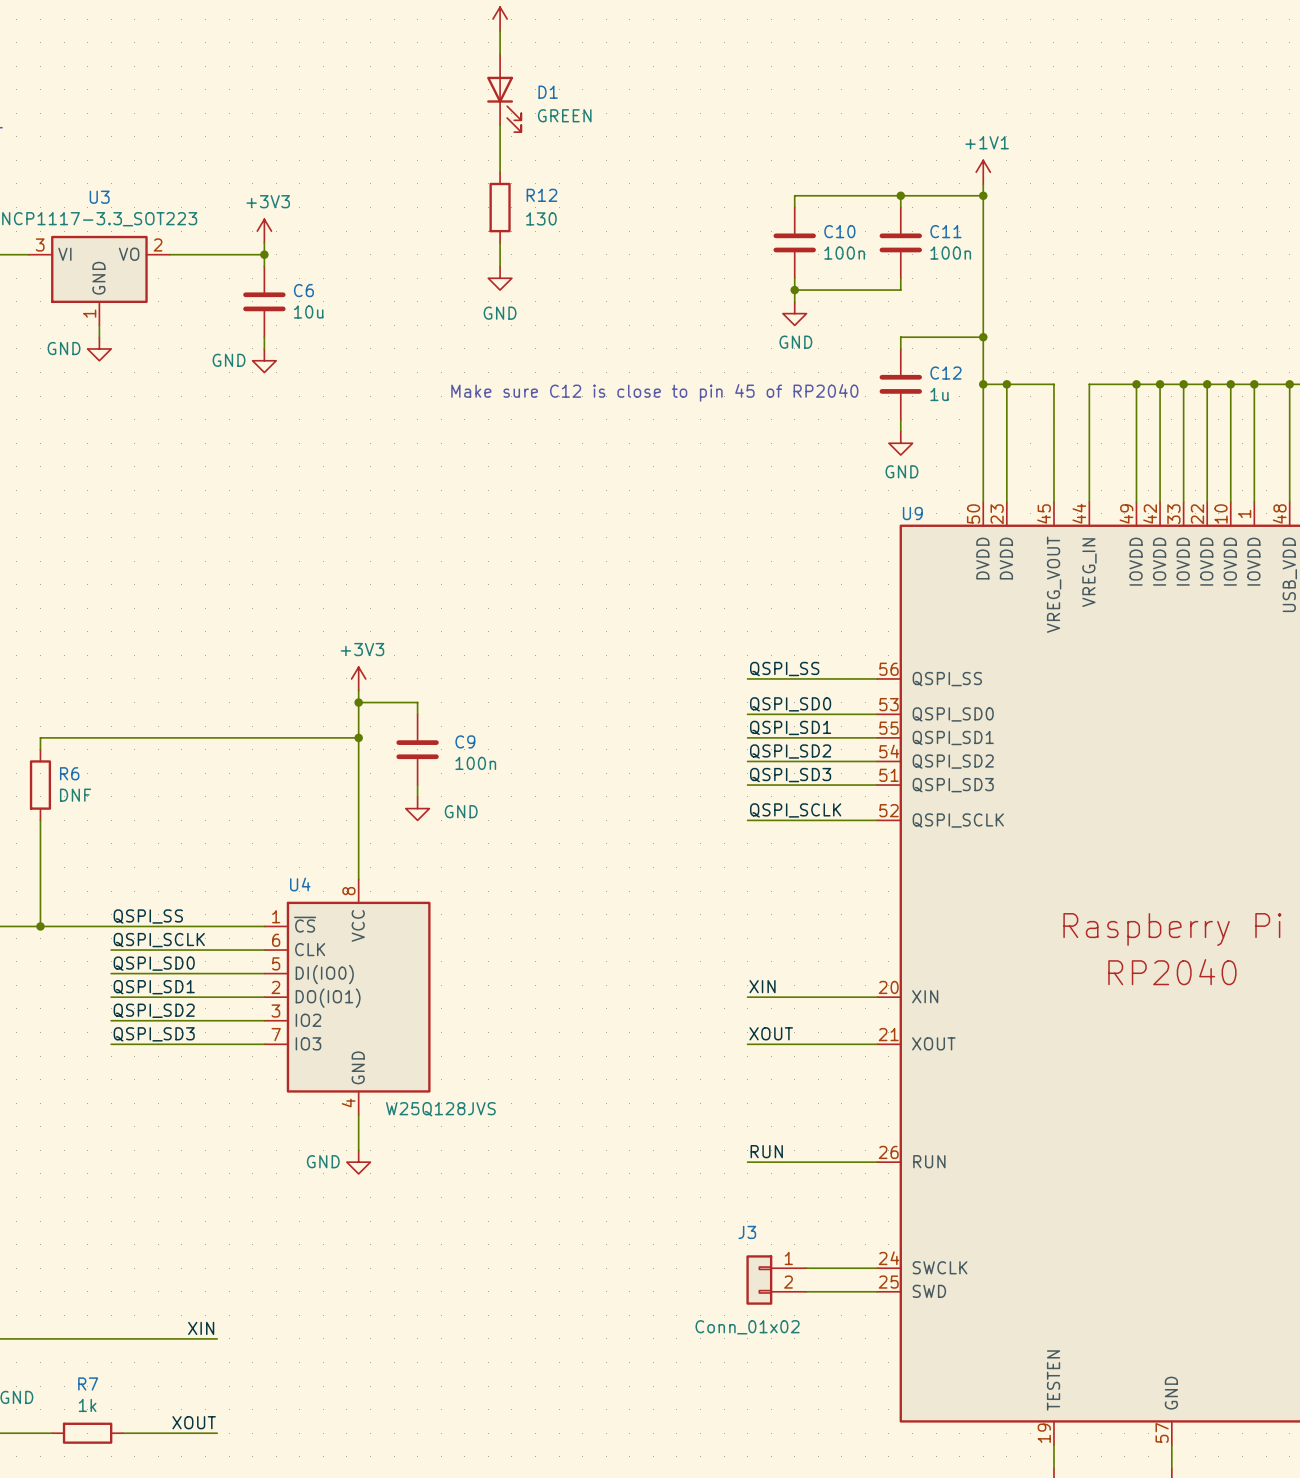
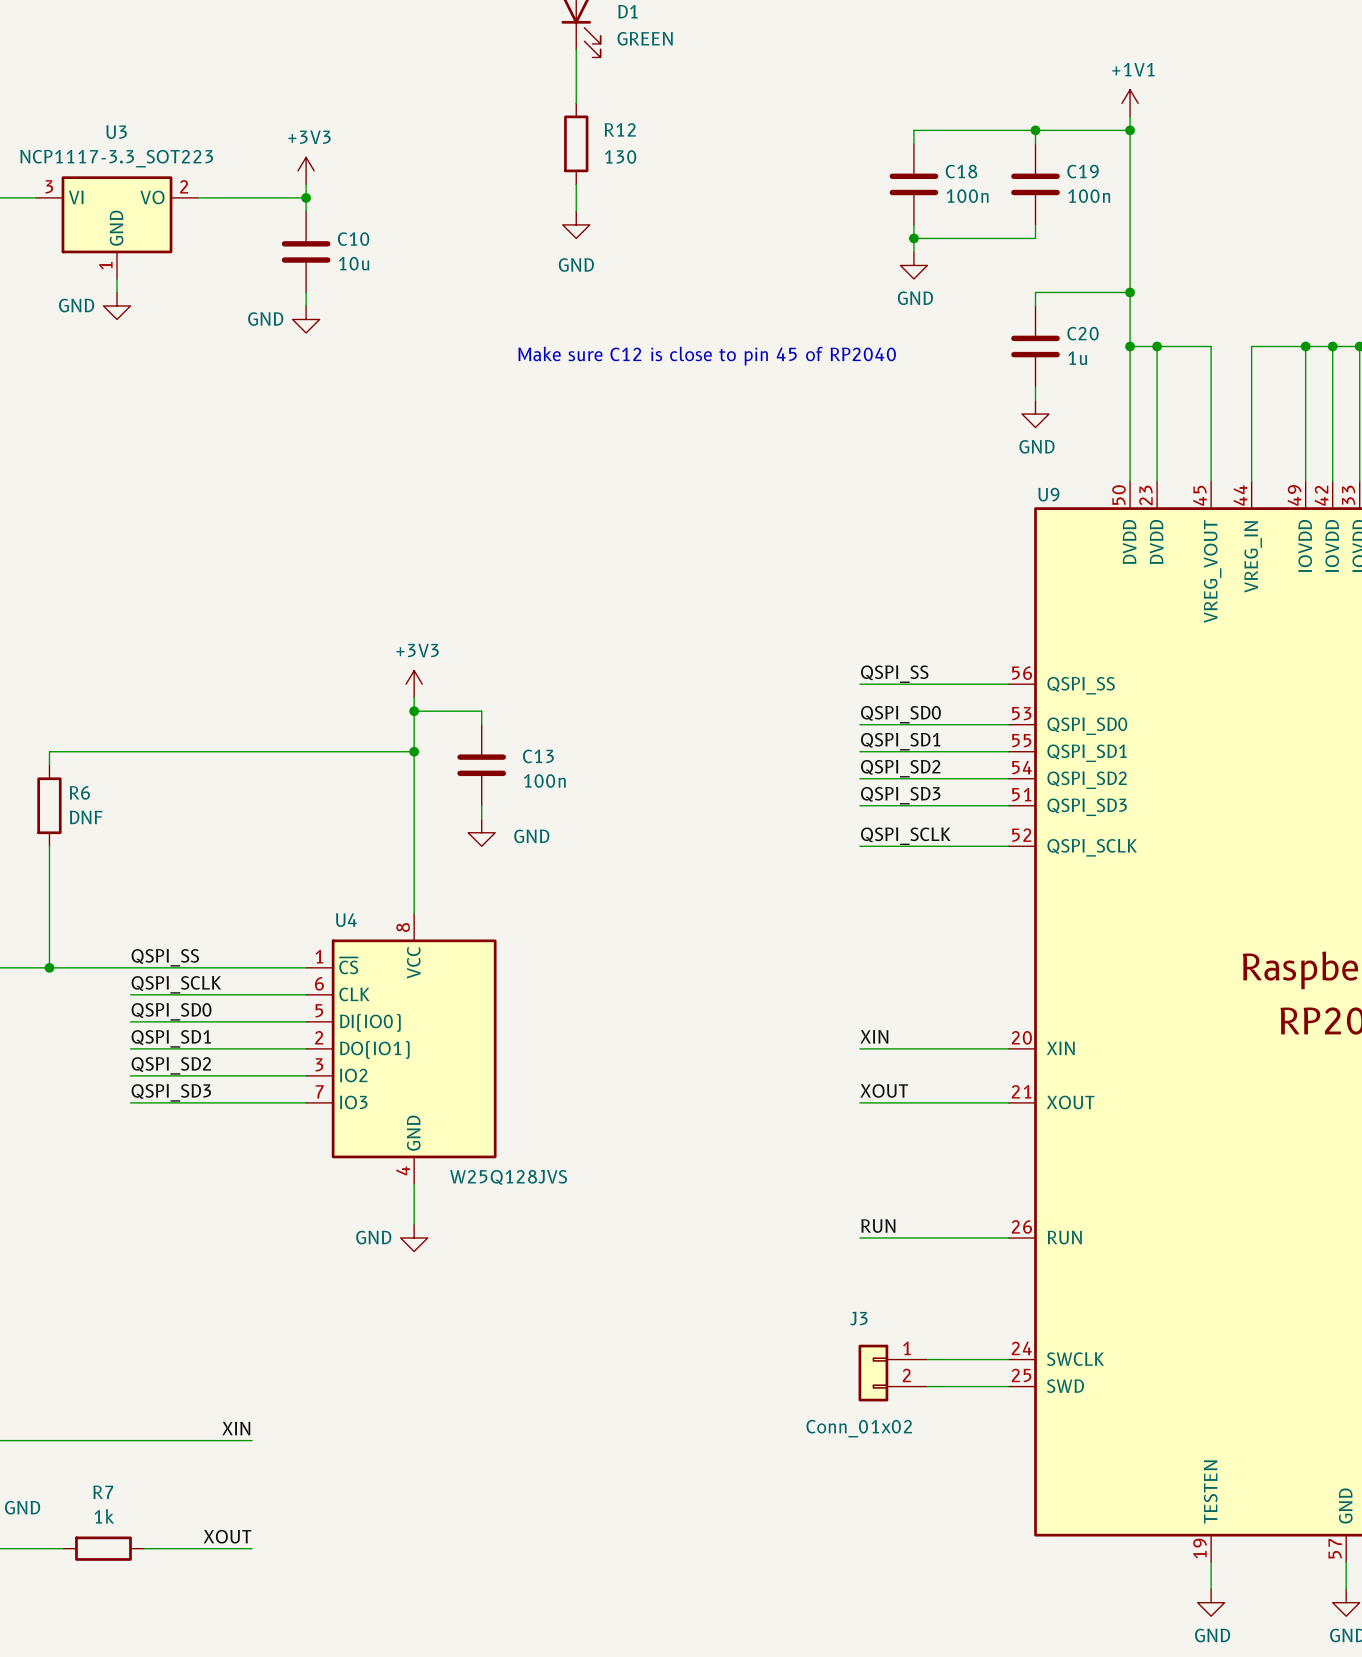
C10 name: C10 (839, 231) -> C18 (961, 171)
C11 name: C11 (945, 231) -> C19 (1083, 171)
C6 name: C6 (303, 290) -> C10 (353, 239)
C12 name: C12 (945, 373) -> C20 (1083, 333)
C9 name: C9 (465, 741) -> C13 (538, 756)

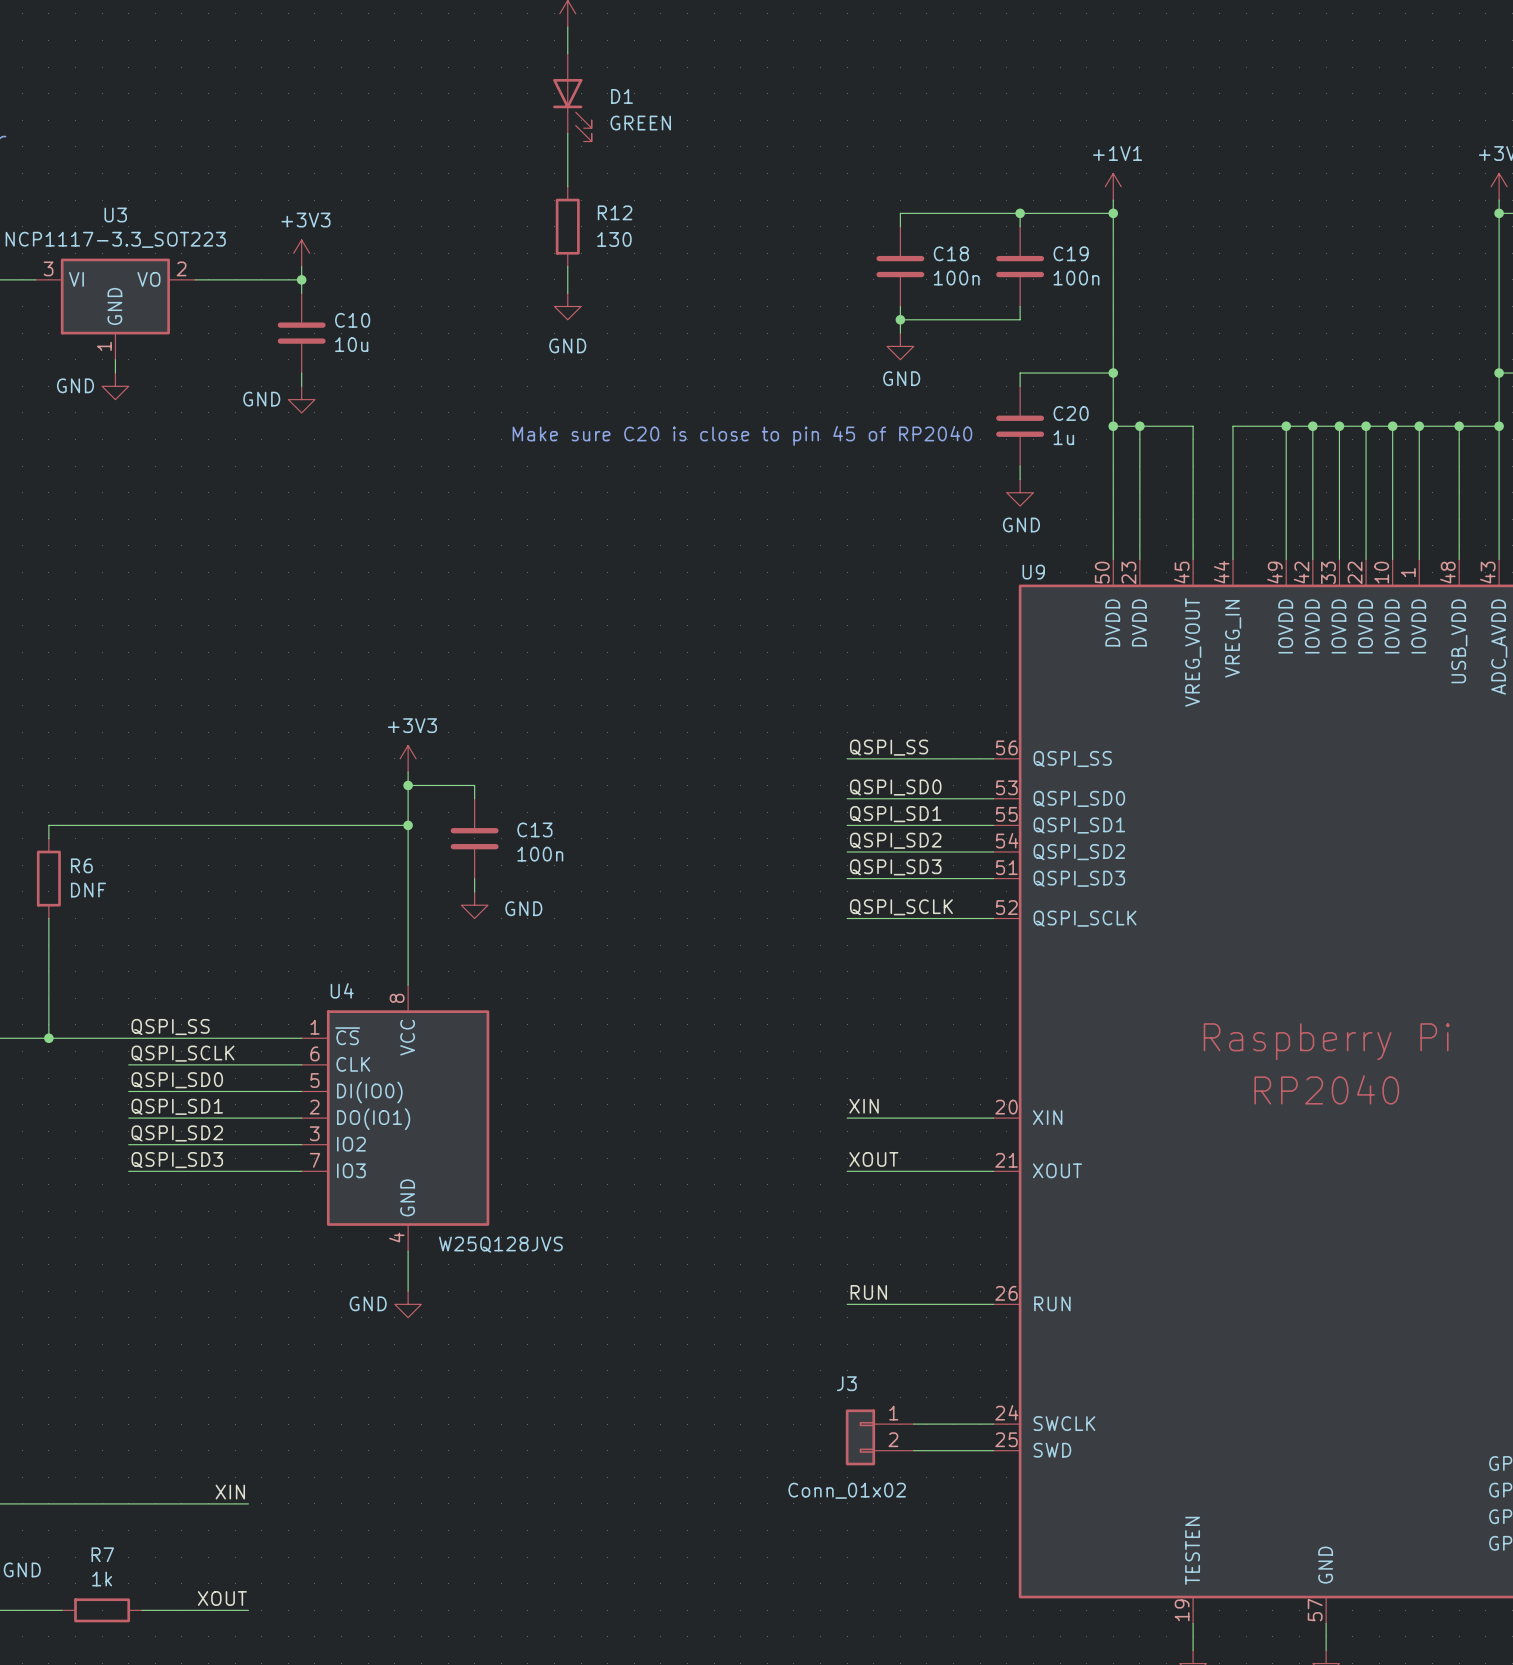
text: Make sure C12 is close to pin 45 of RP2040 (707, 356) -> Make sure C20 is close to pin 45 of RP2040 (742, 435)

